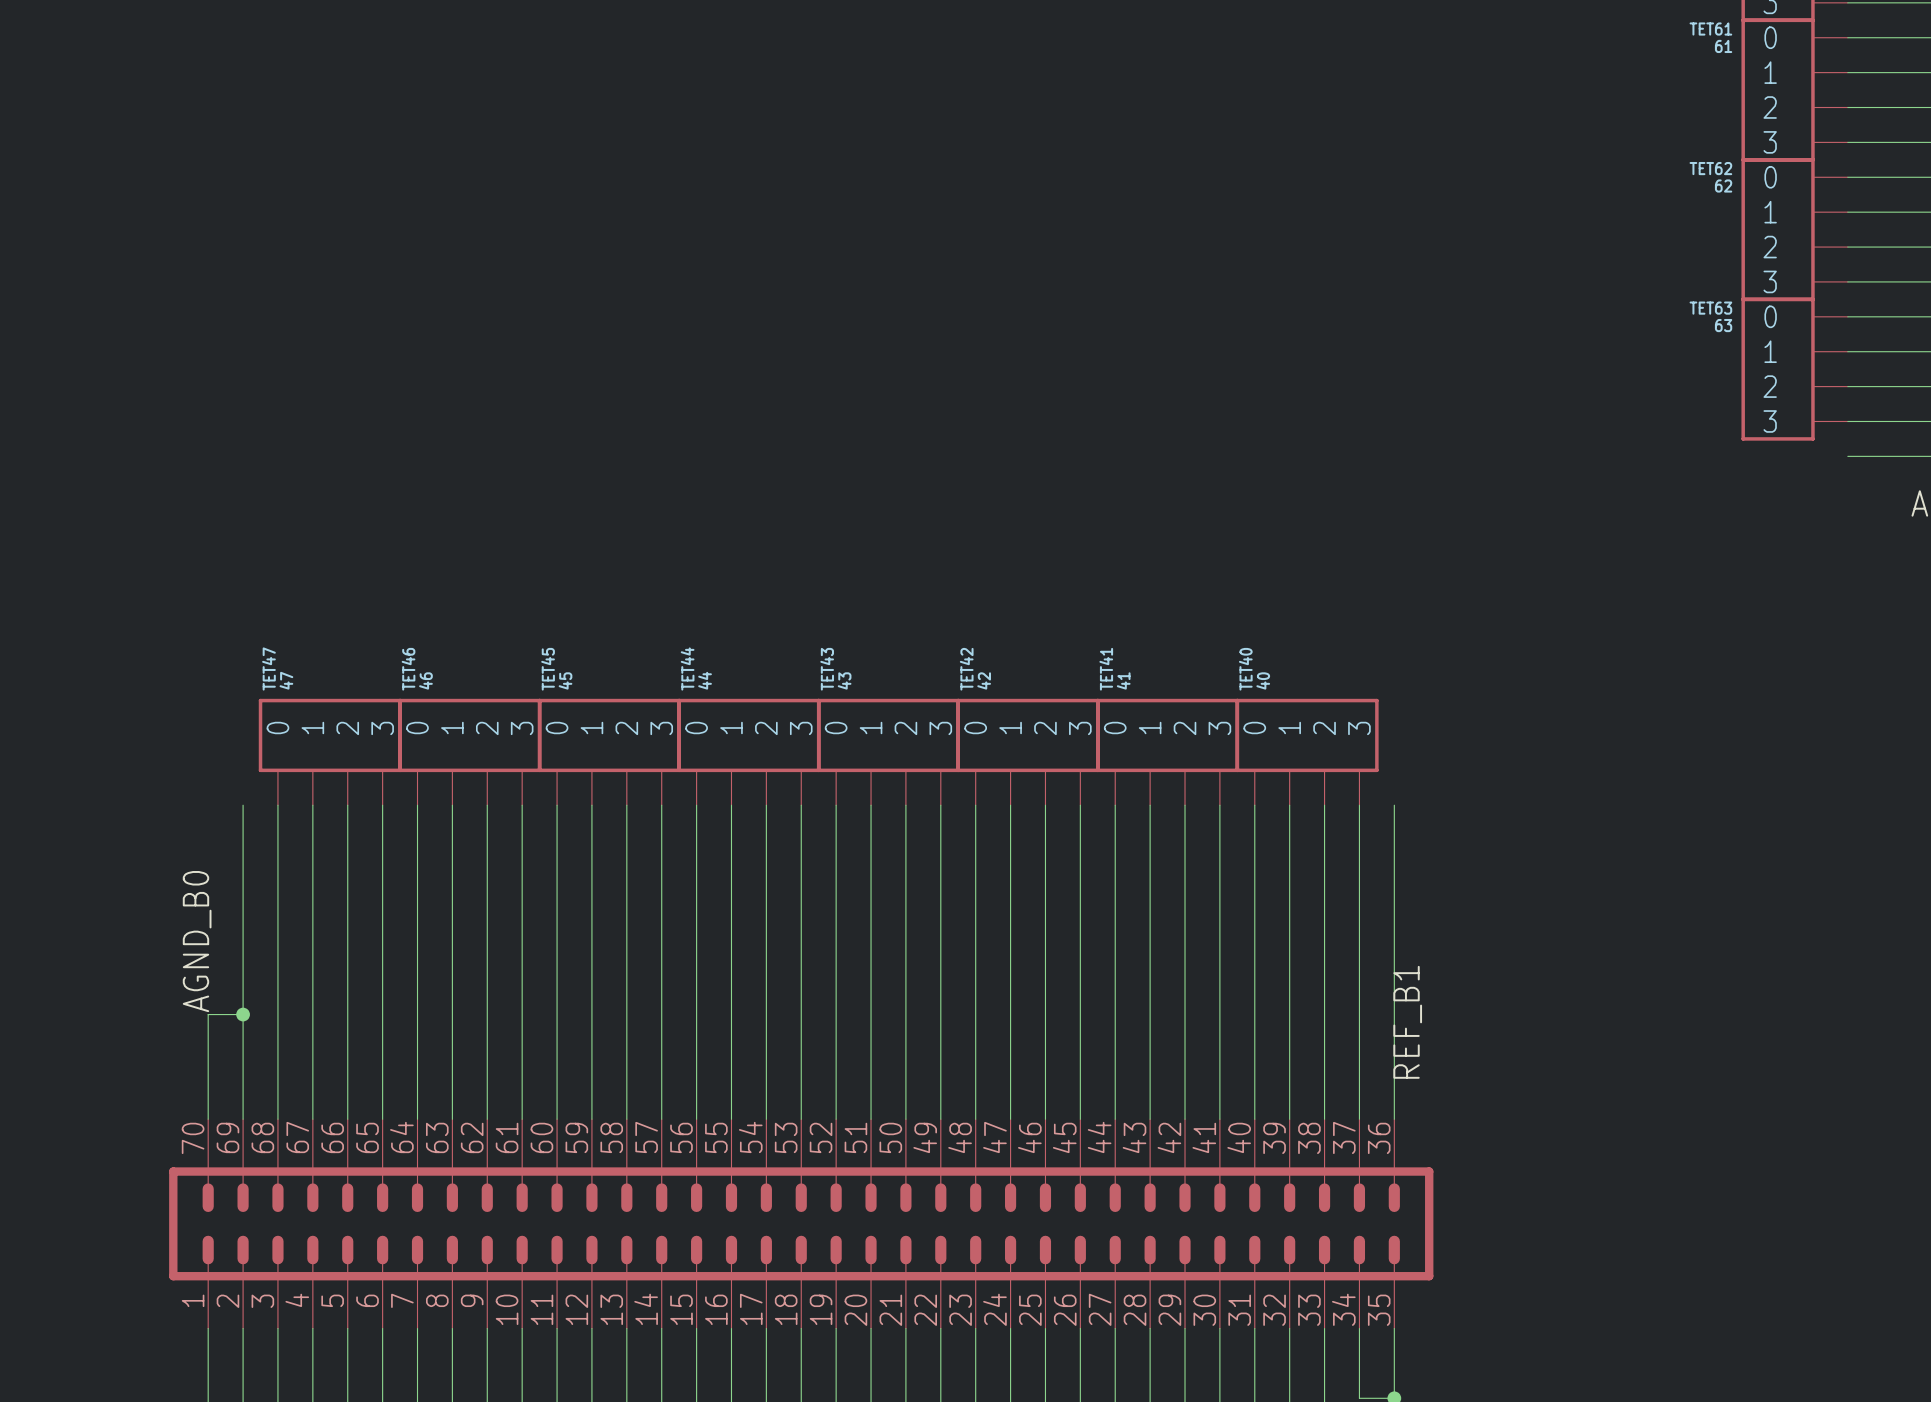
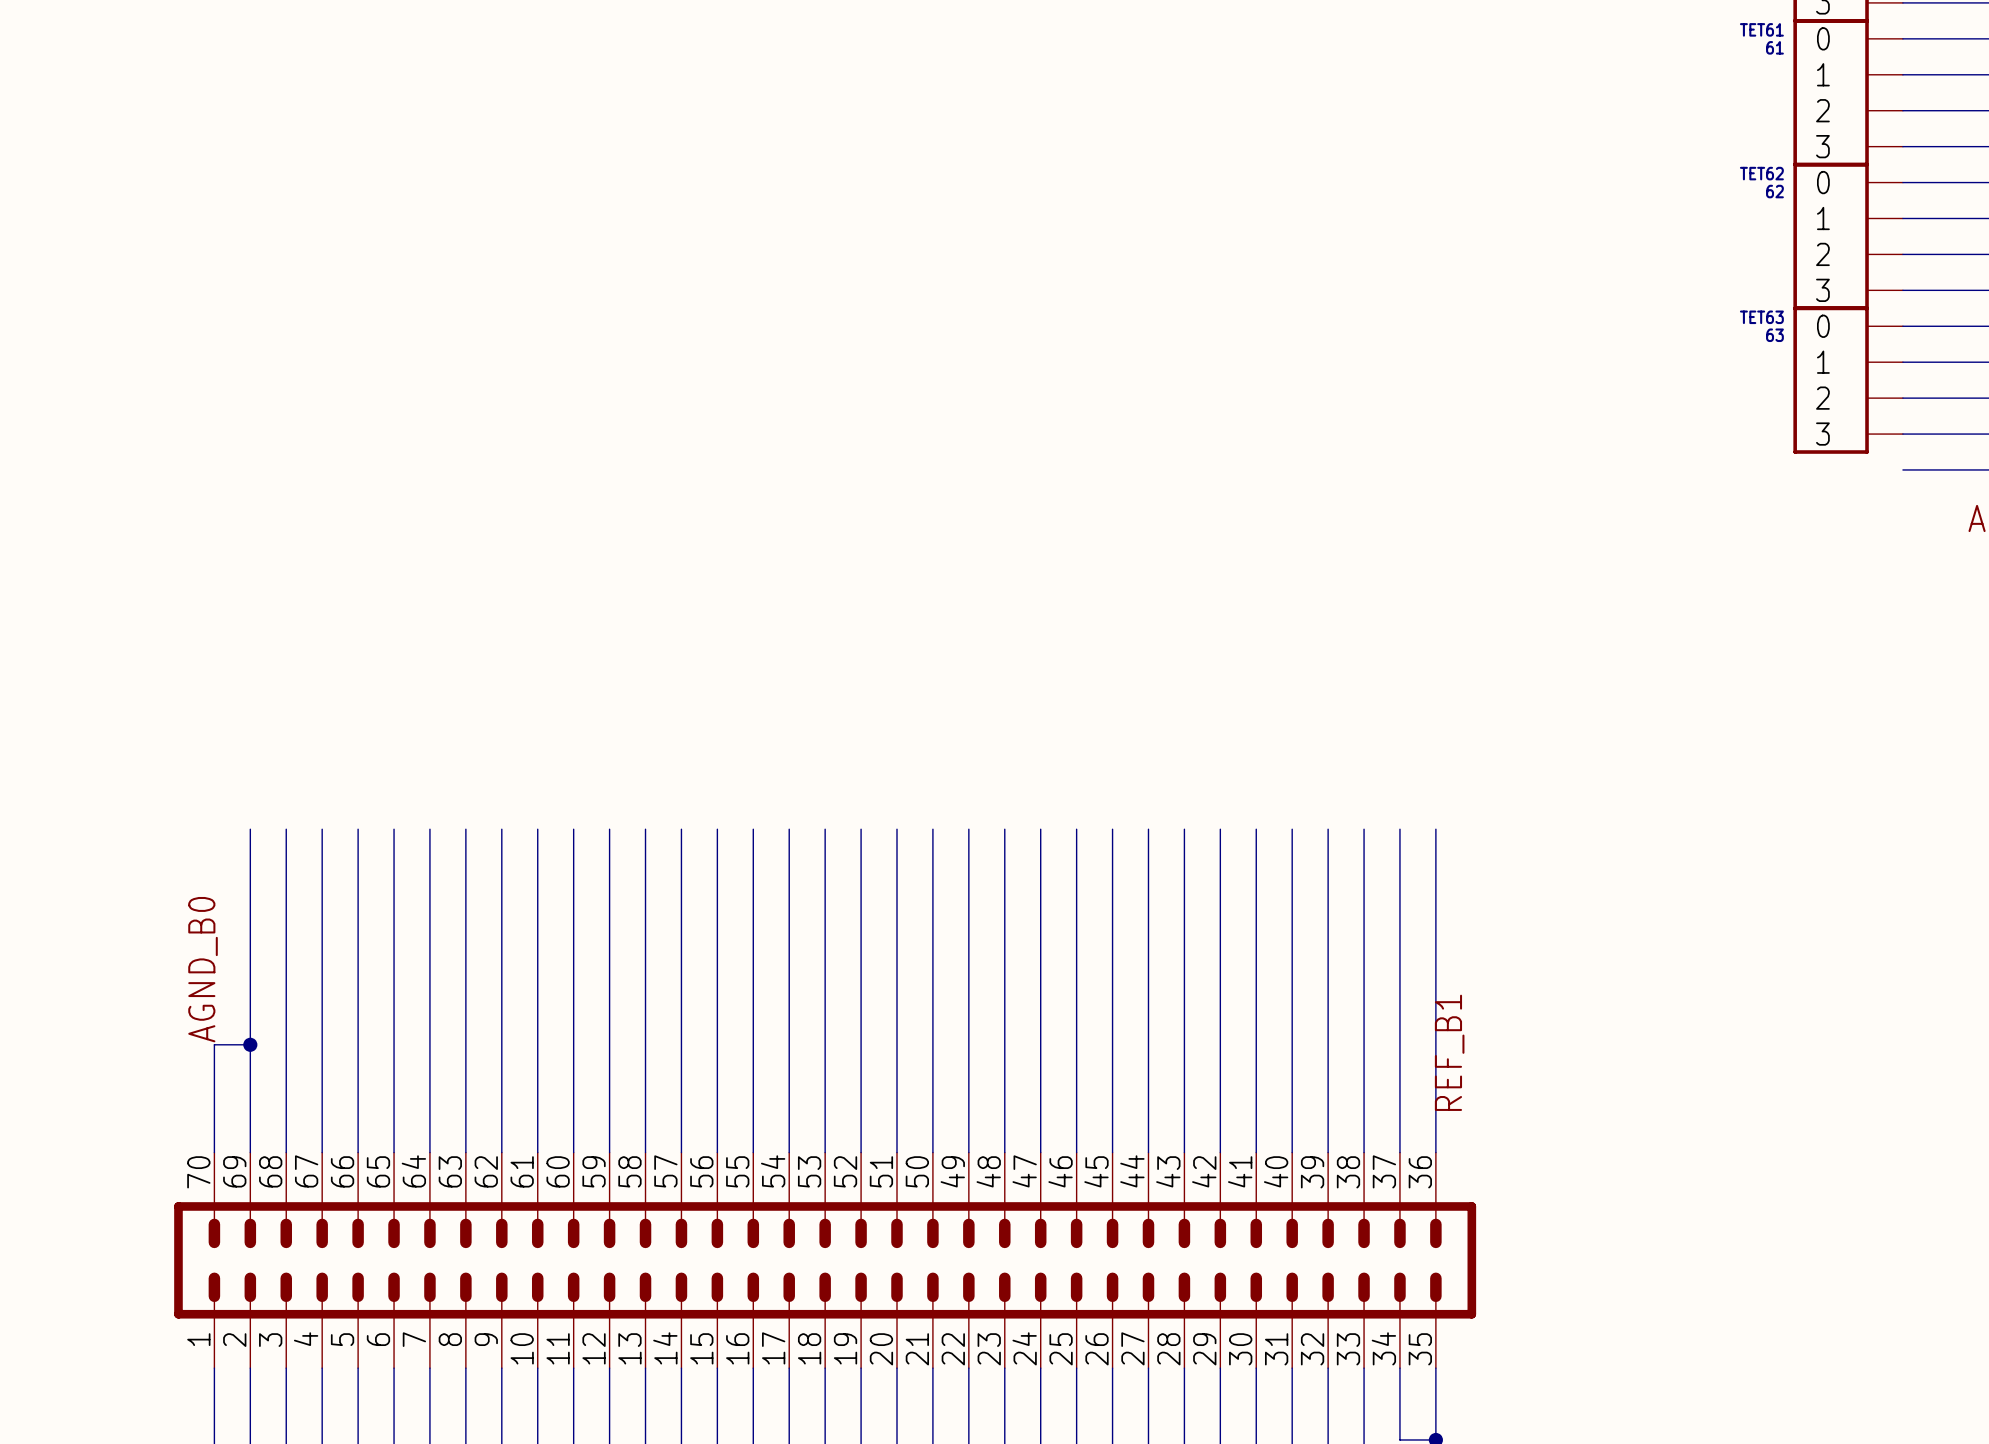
TET47: 47 (330, 752) -> none
TET46: 46 (469, 752) -> none
TET45: 45 (609, 752) -> none
TET44: 44 (748, 752) -> none
TET43: 43 (888, 752) -> none
TET42: 42 (1028, 752) -> none
TET41: 41 (1167, 752) -> none
TET40: 40 (1307, 752) -> none

